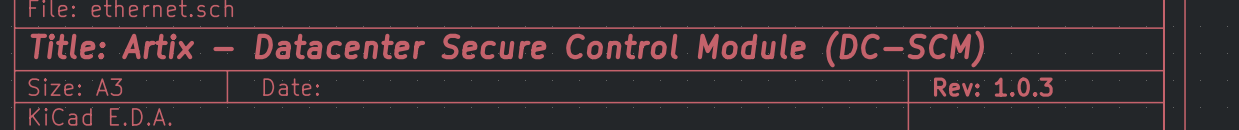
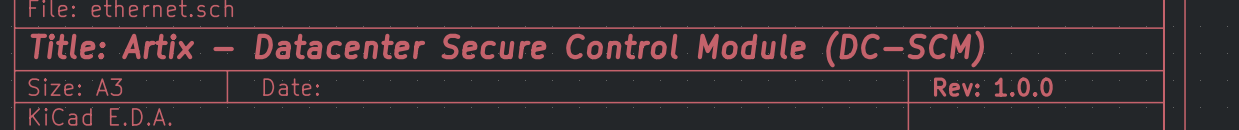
title block: Rev: 1.0.3 (993, 87) -> Rev: 1.0.0 (993, 87)

